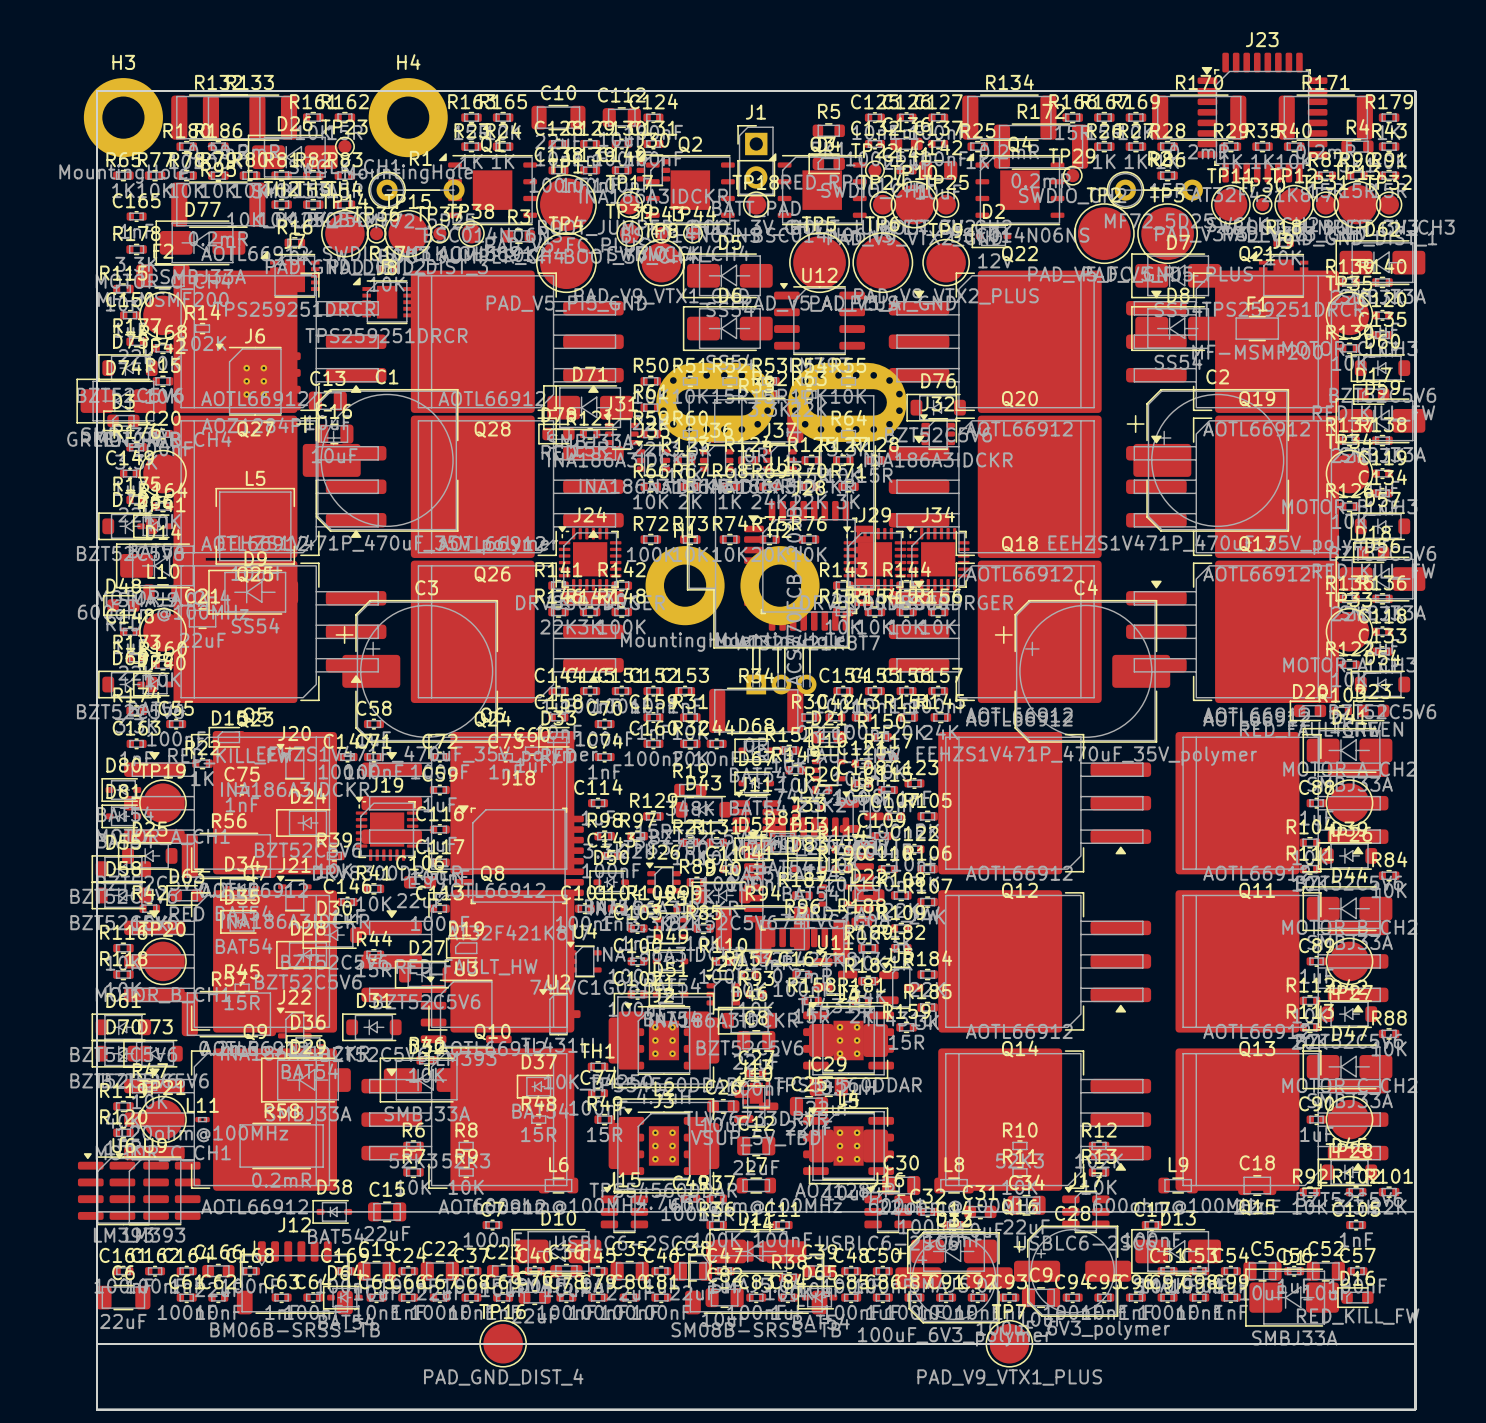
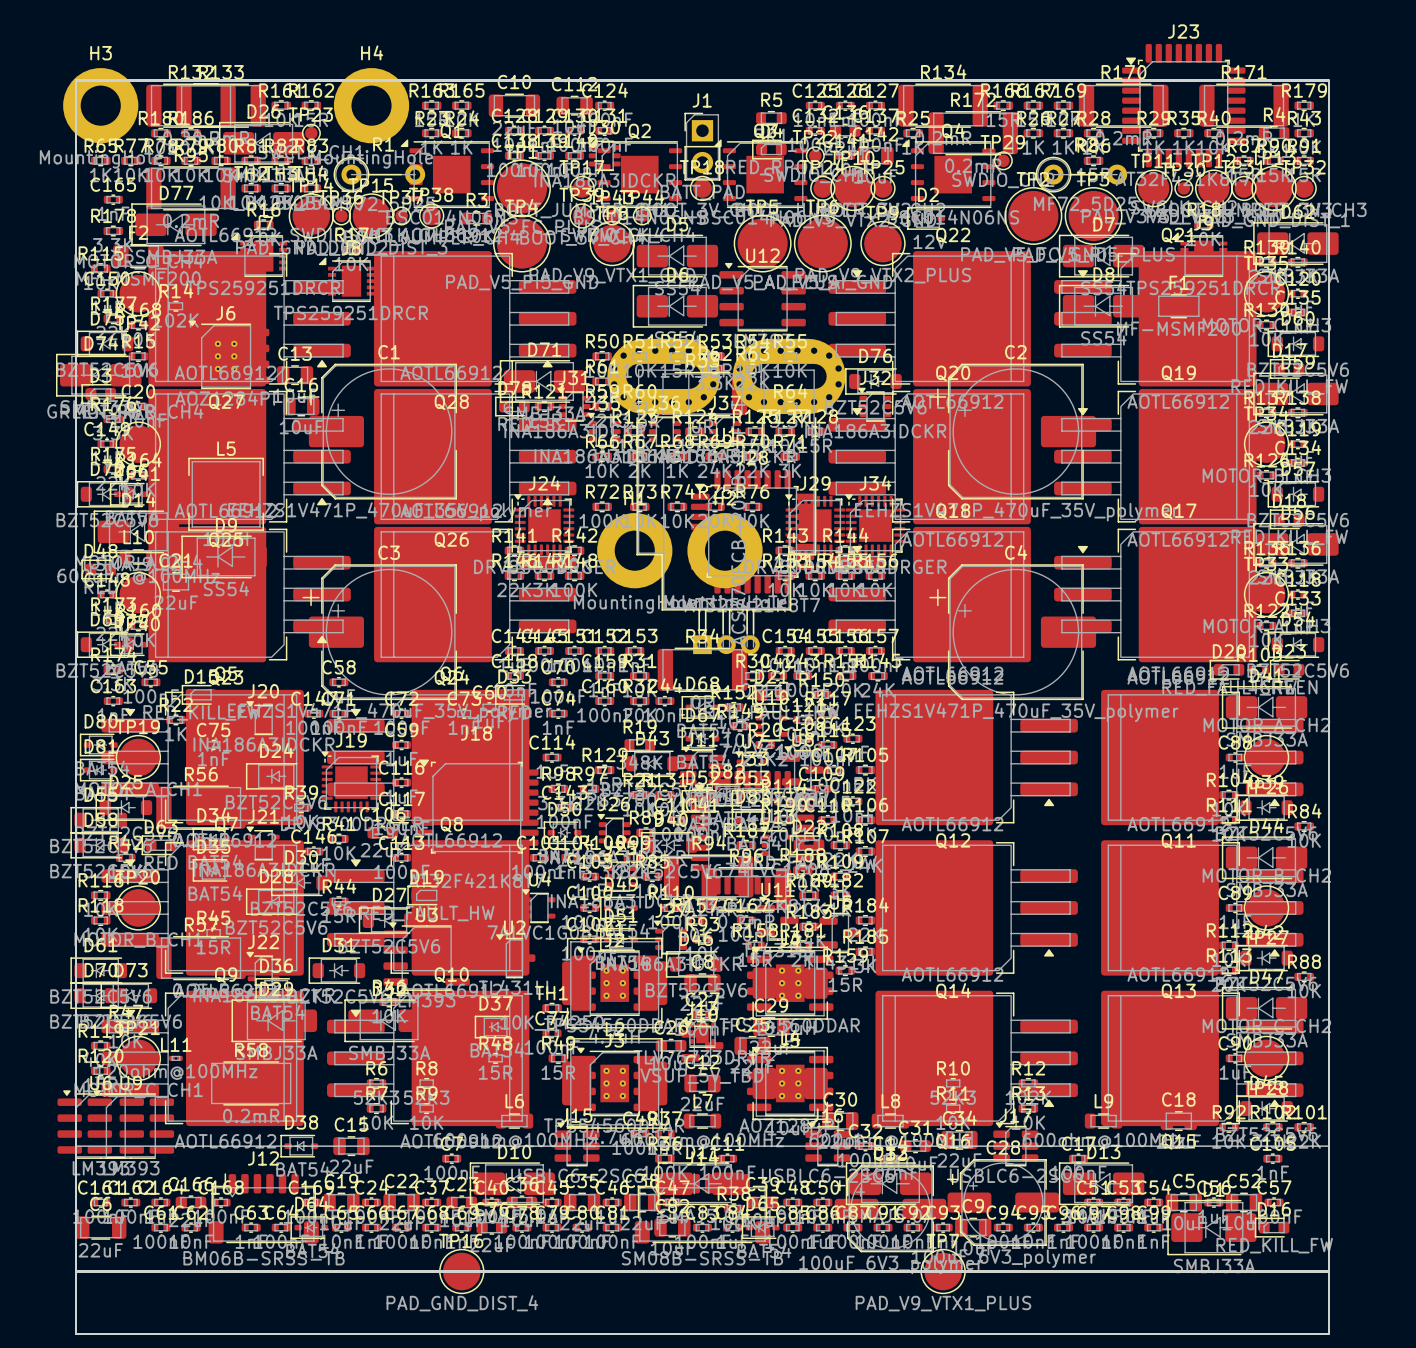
C1 position: (383, 460) -> (385, 431)
C2 position: (1214, 460) -> (1012, 431)

